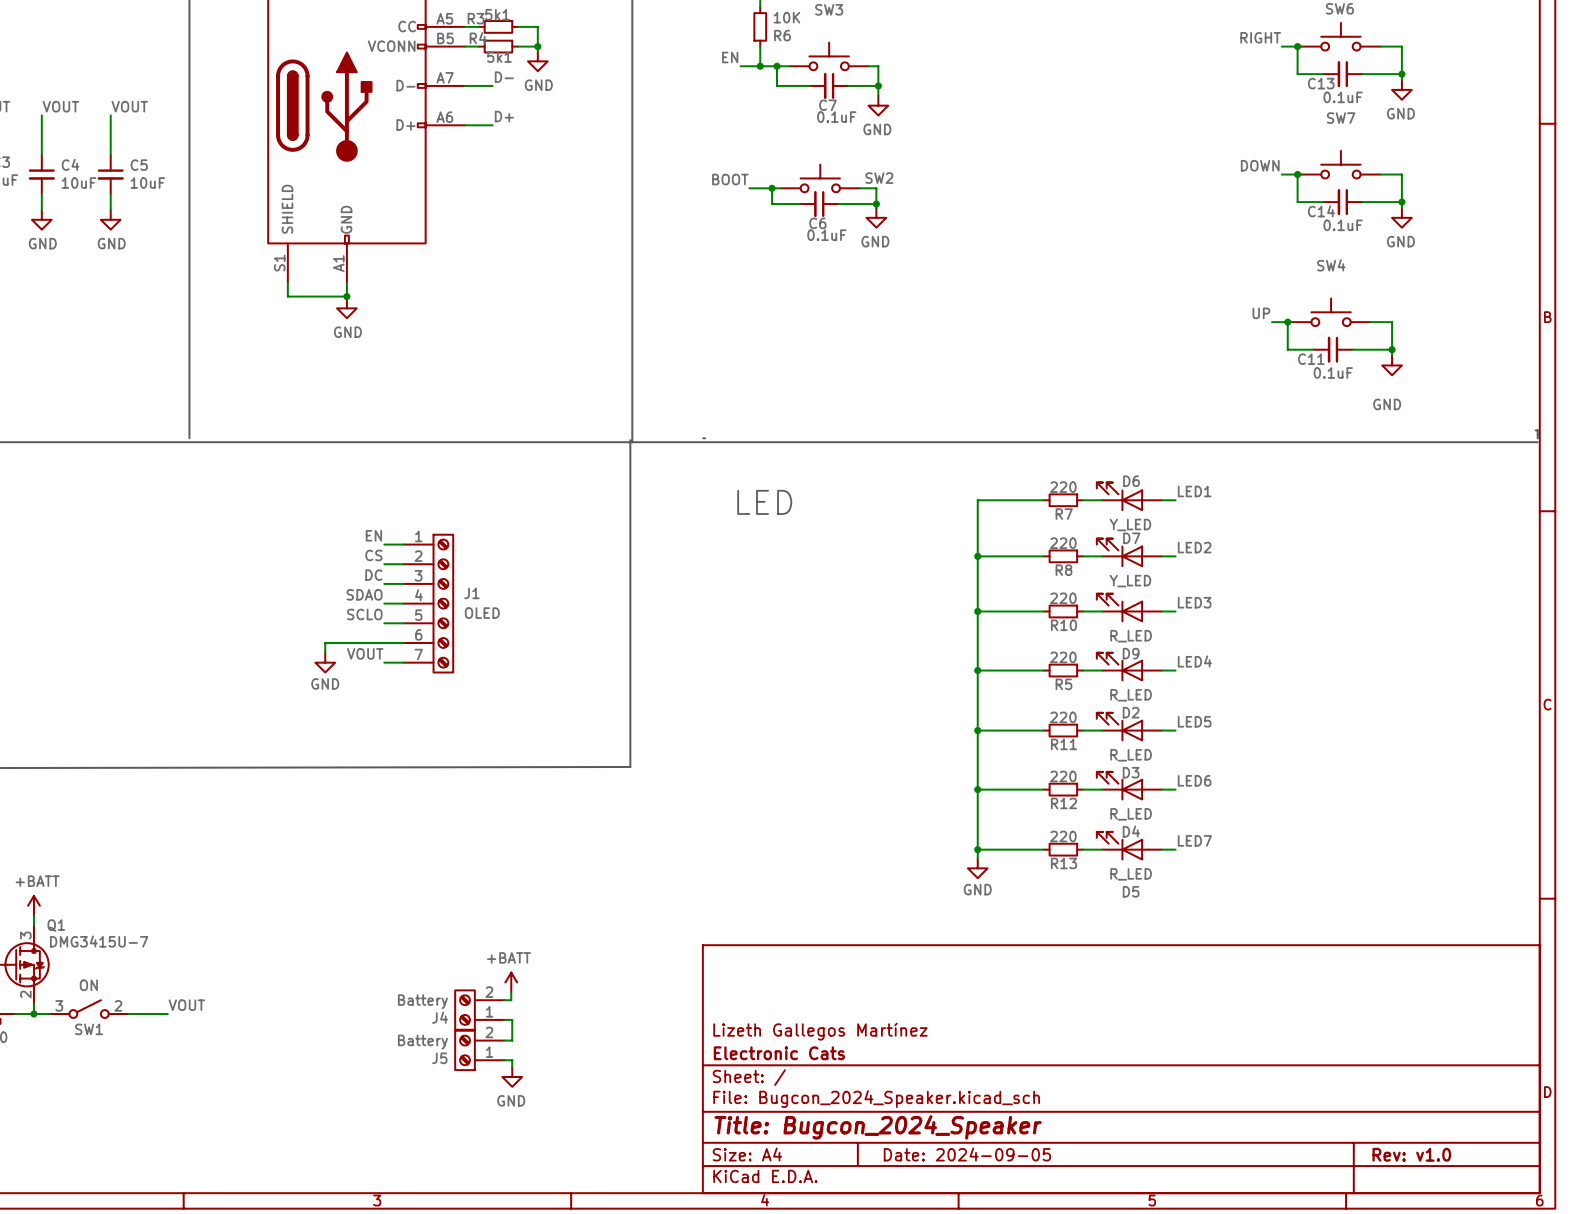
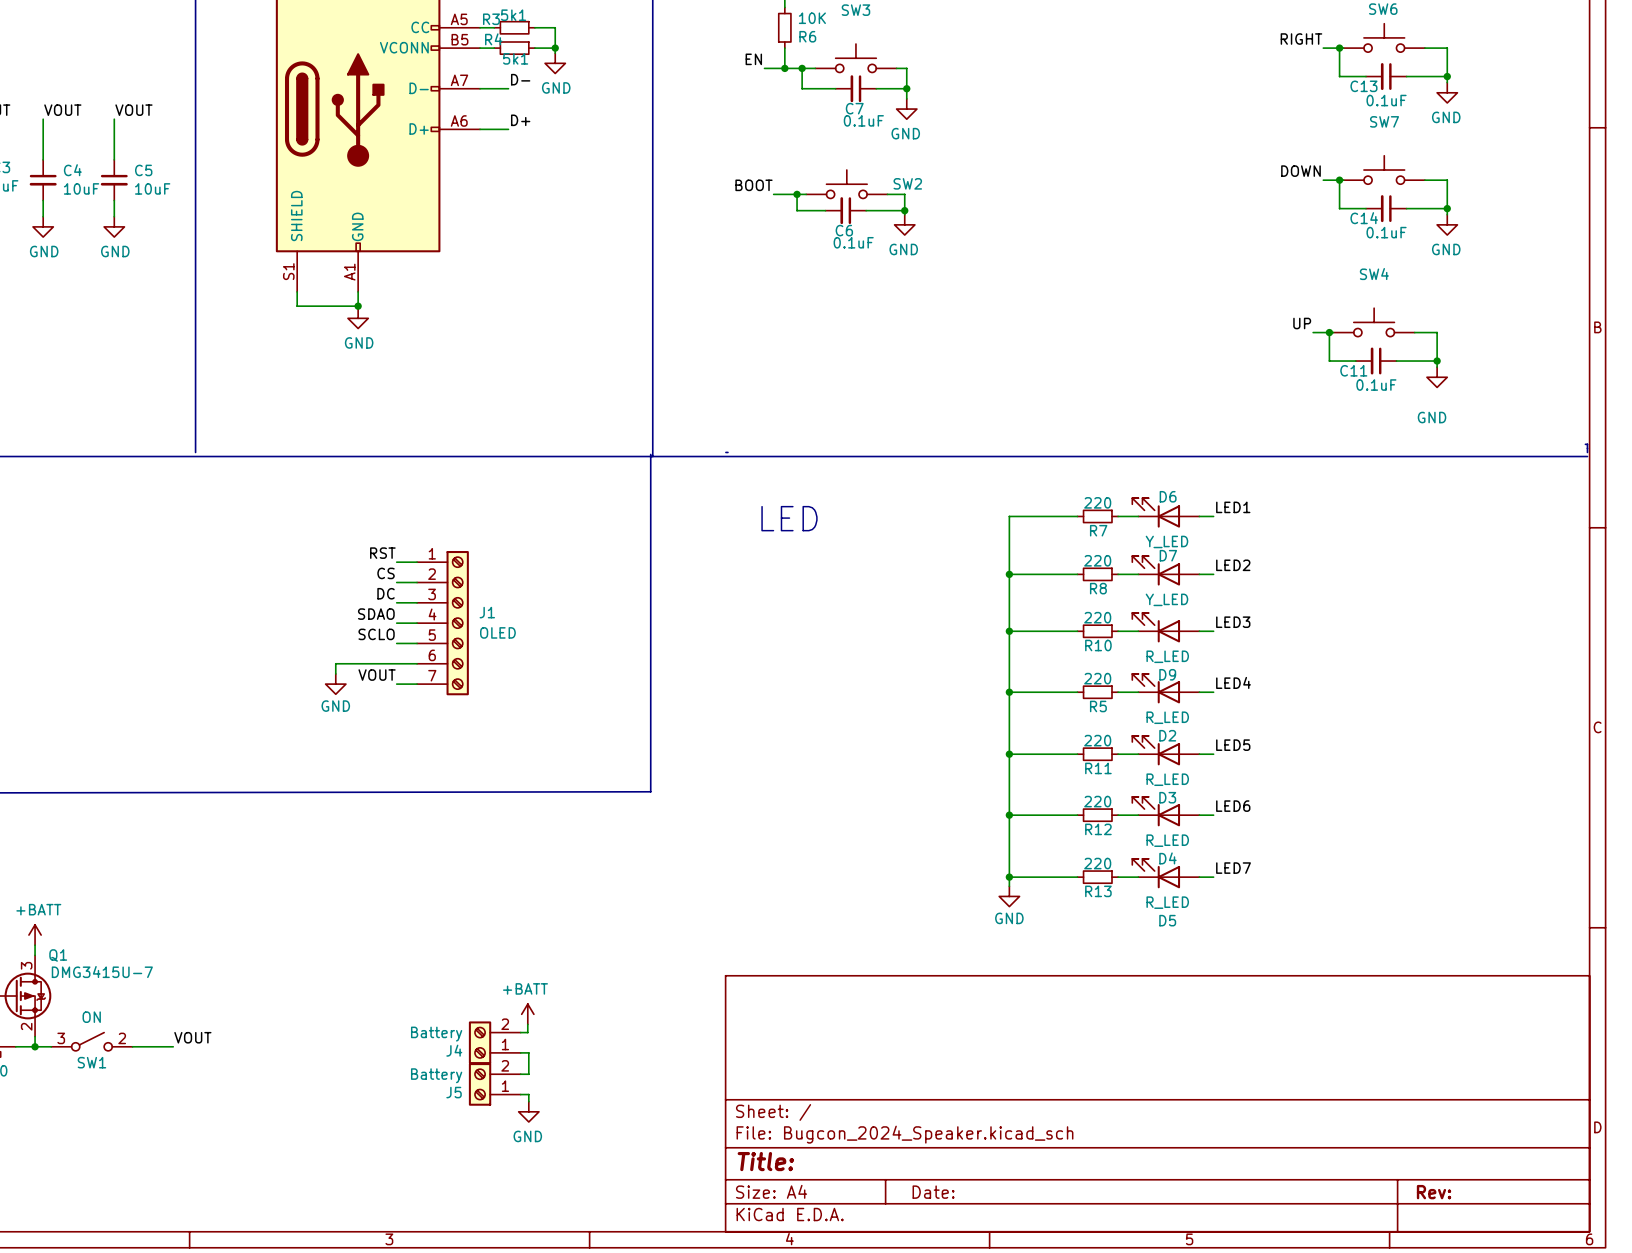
label: EN (373, 535) -> RST (382, 553)
title block: Lizeth Gallegos Martínez (820, 1031) -> none
title block: Electronic Cats (779, 1053) -> none
title block: Title: Bugcon_2024_Speaker (878, 1127) -> Title: (765, 1161)
title block: Date: 2024-09-05 (967, 1154) -> Date: (933, 1192)
title block: Rev: v1.0 (1411, 1154) -> Rev: (1434, 1192)

